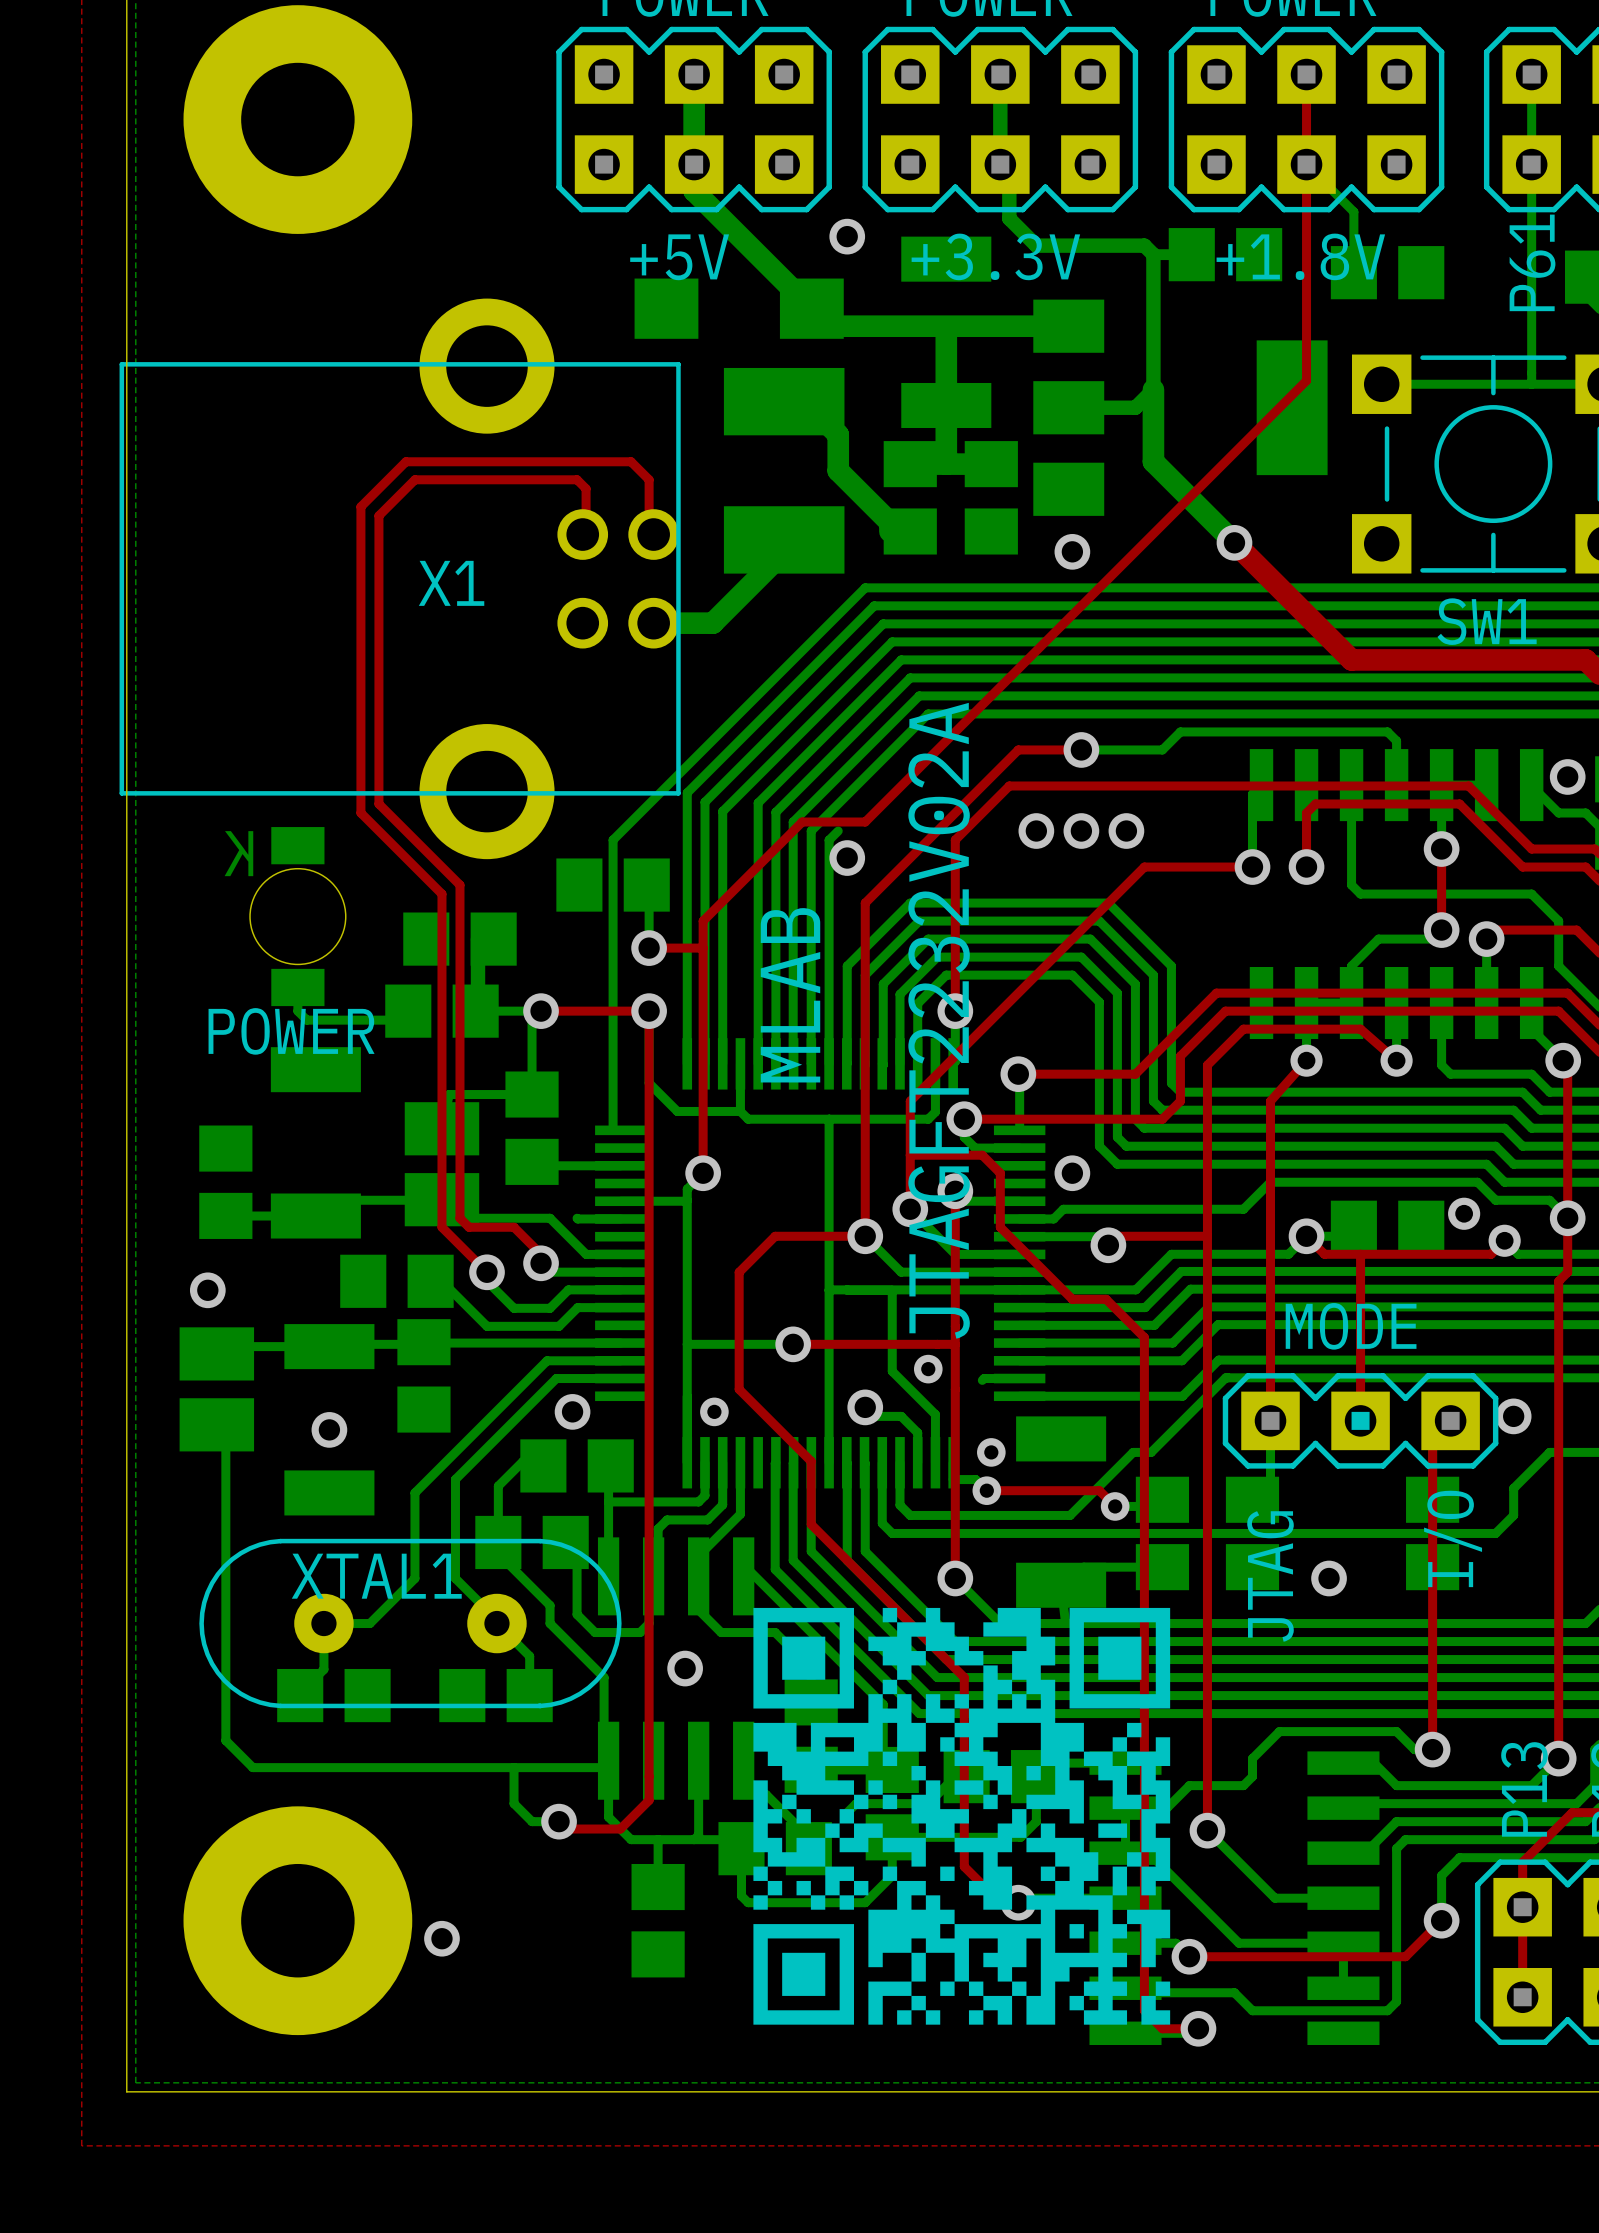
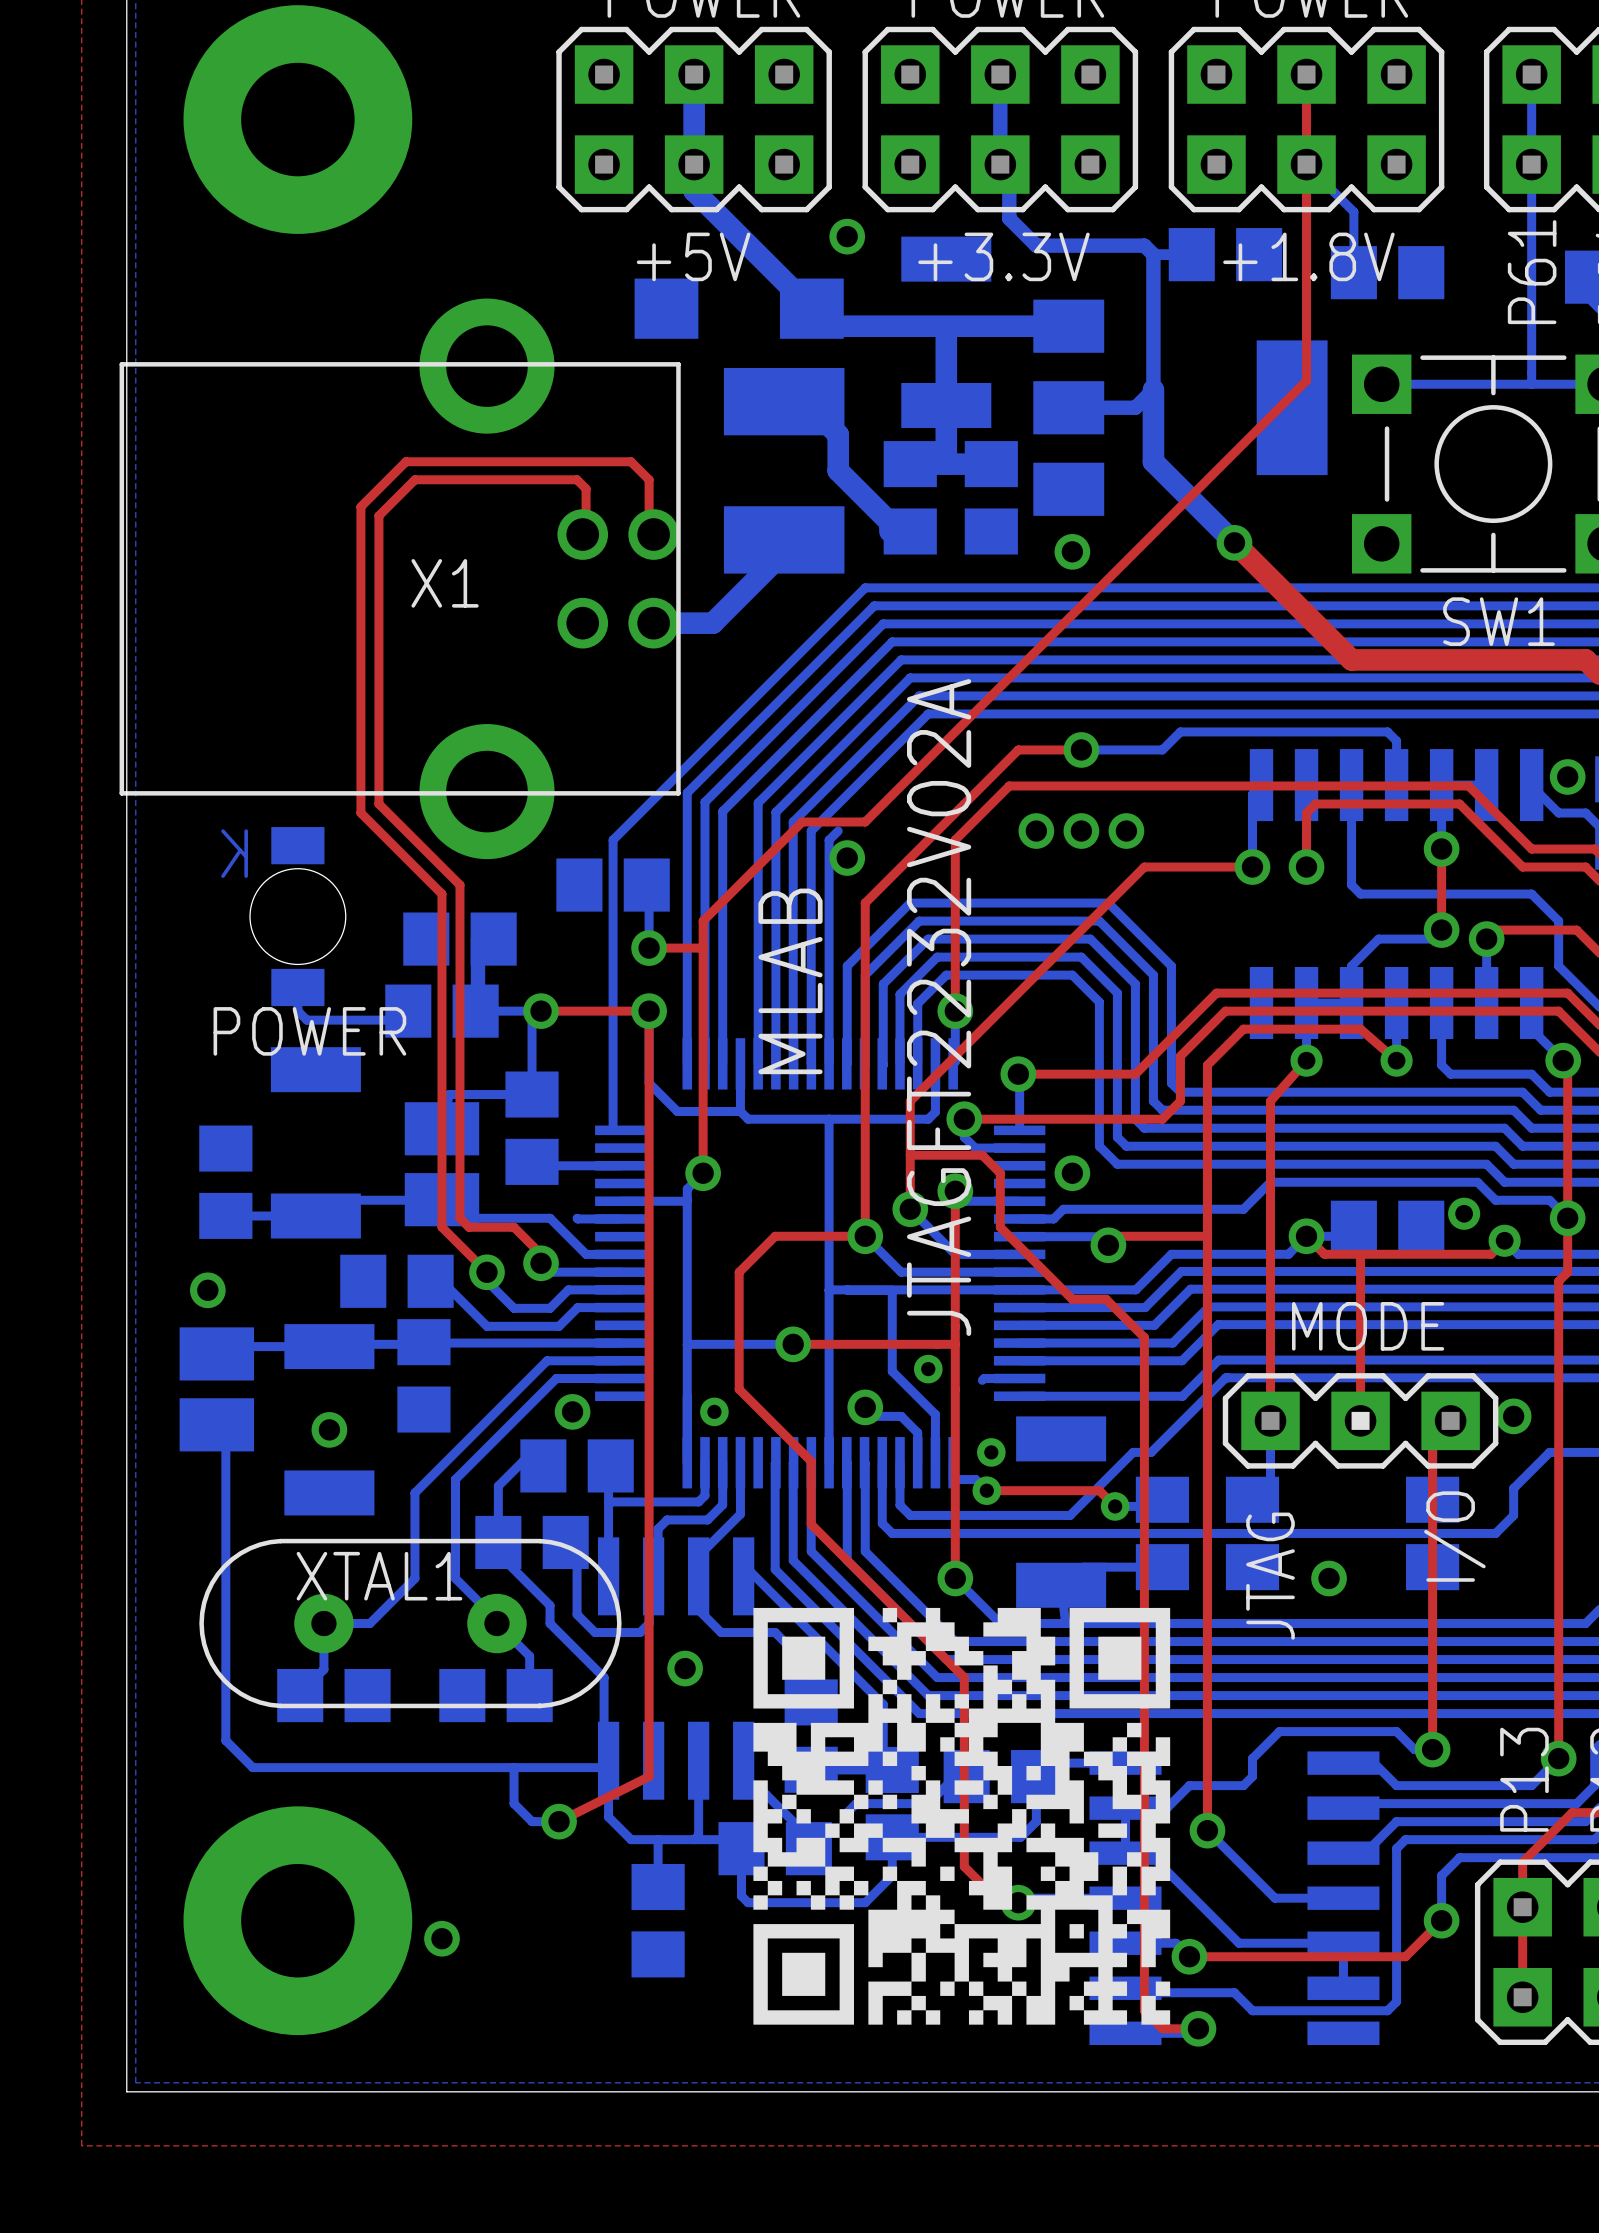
top track: (649, 1776) (649, 1800) (620, 1829) (566, 1829) (559, 1821) -> (649, 1776) (559, 1821)

